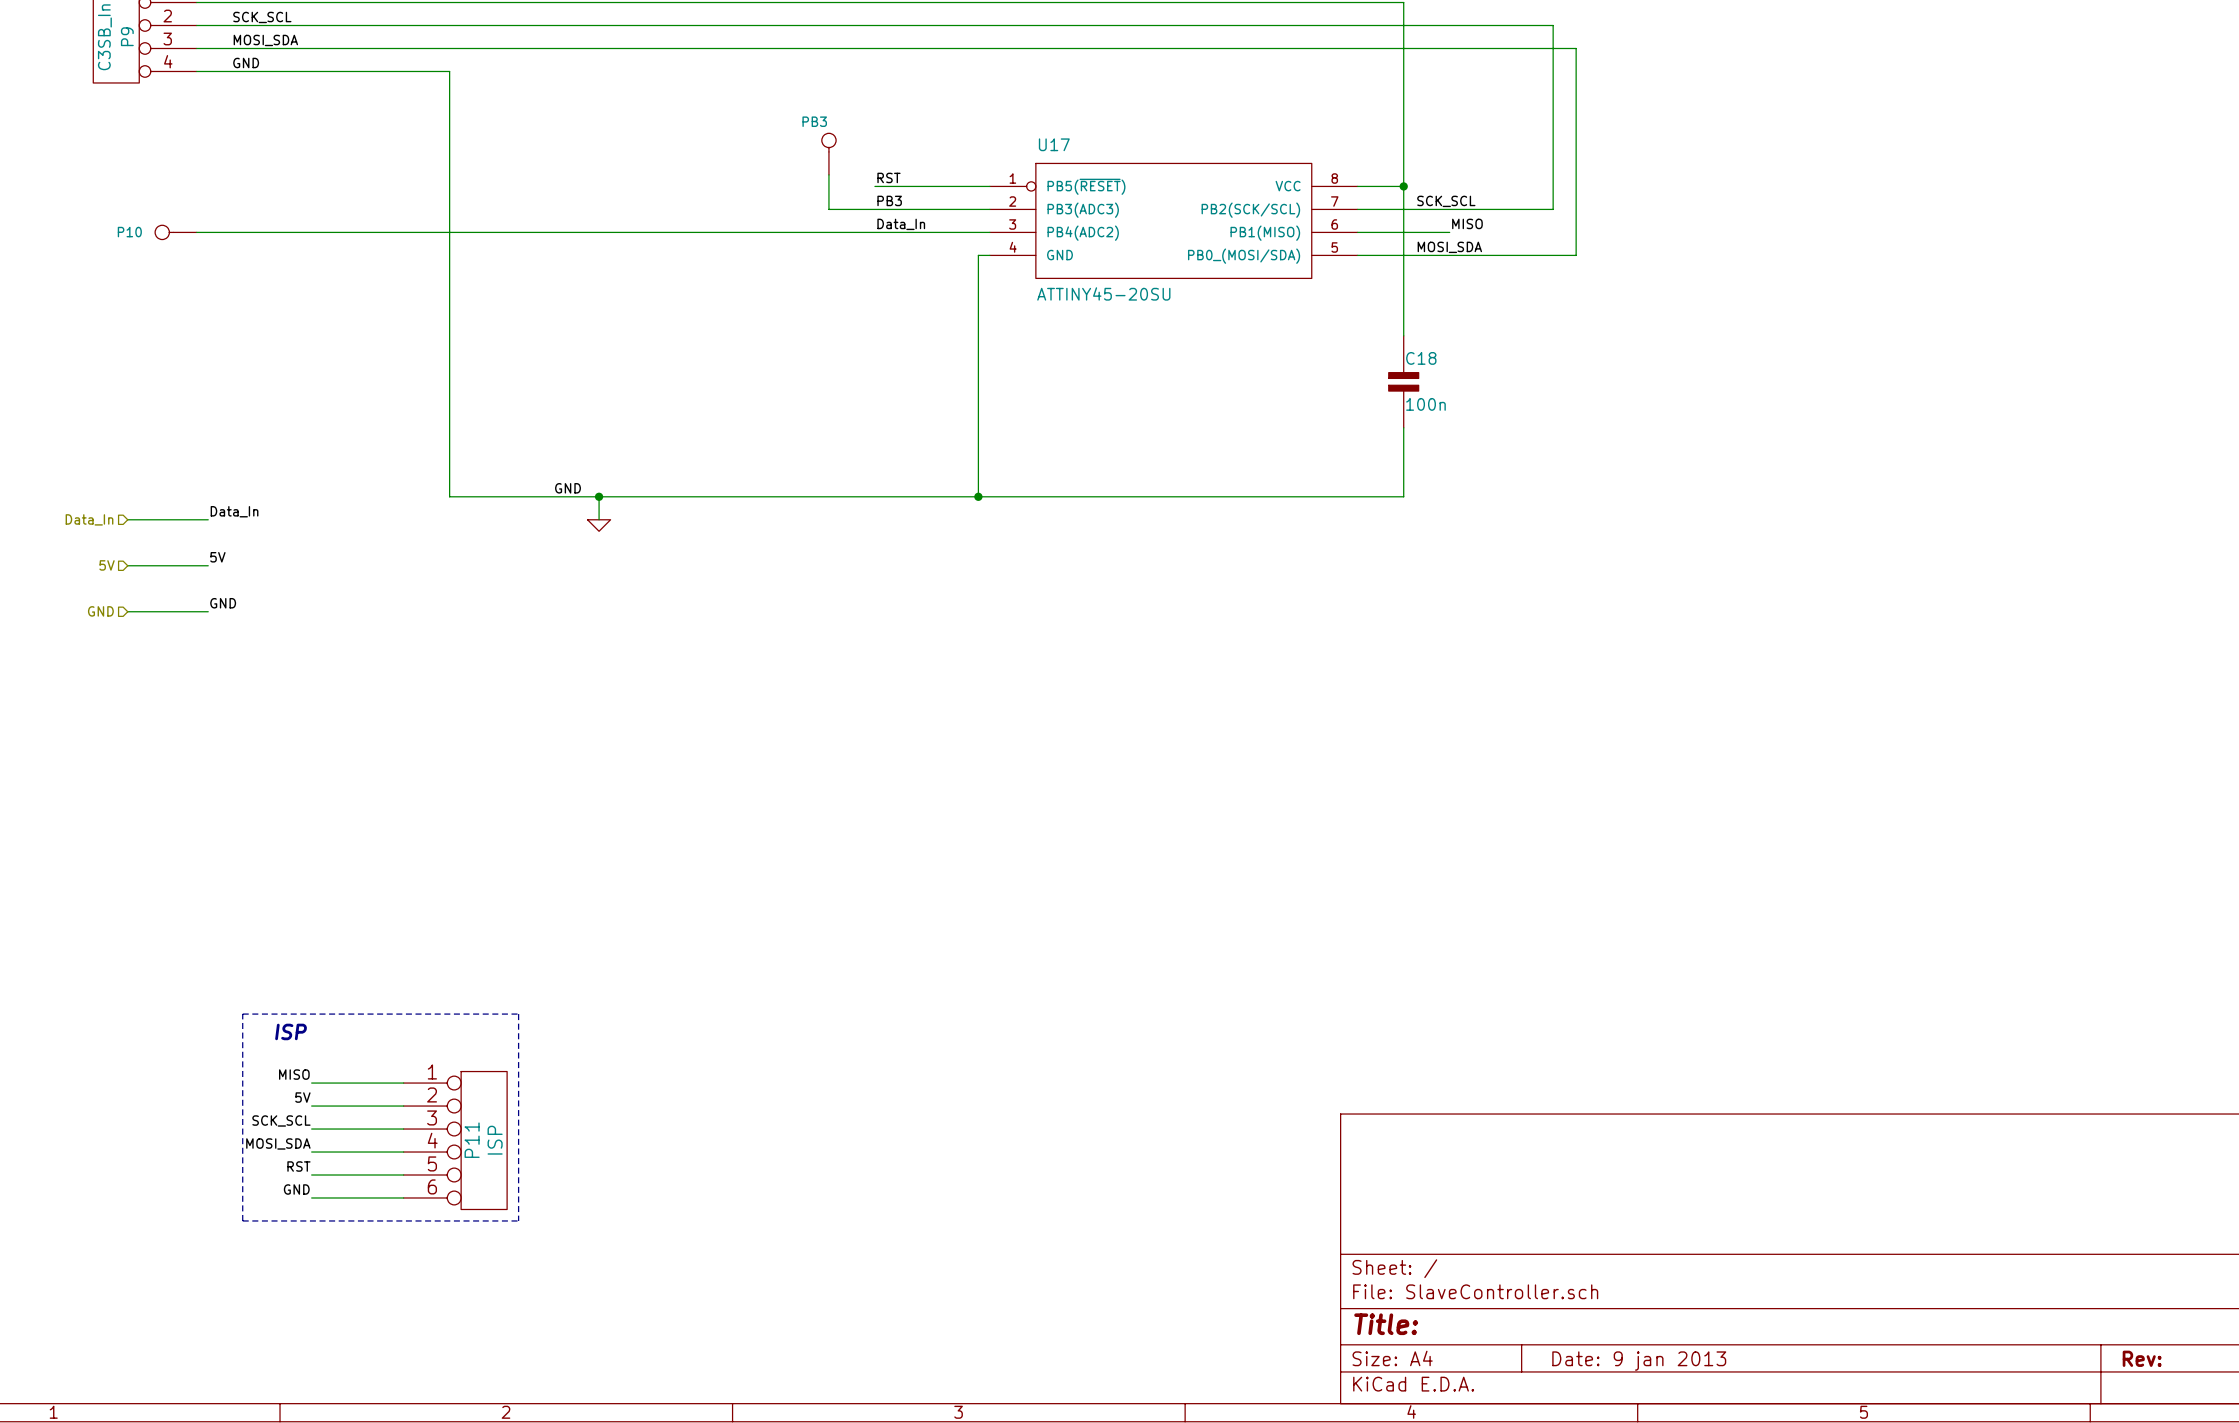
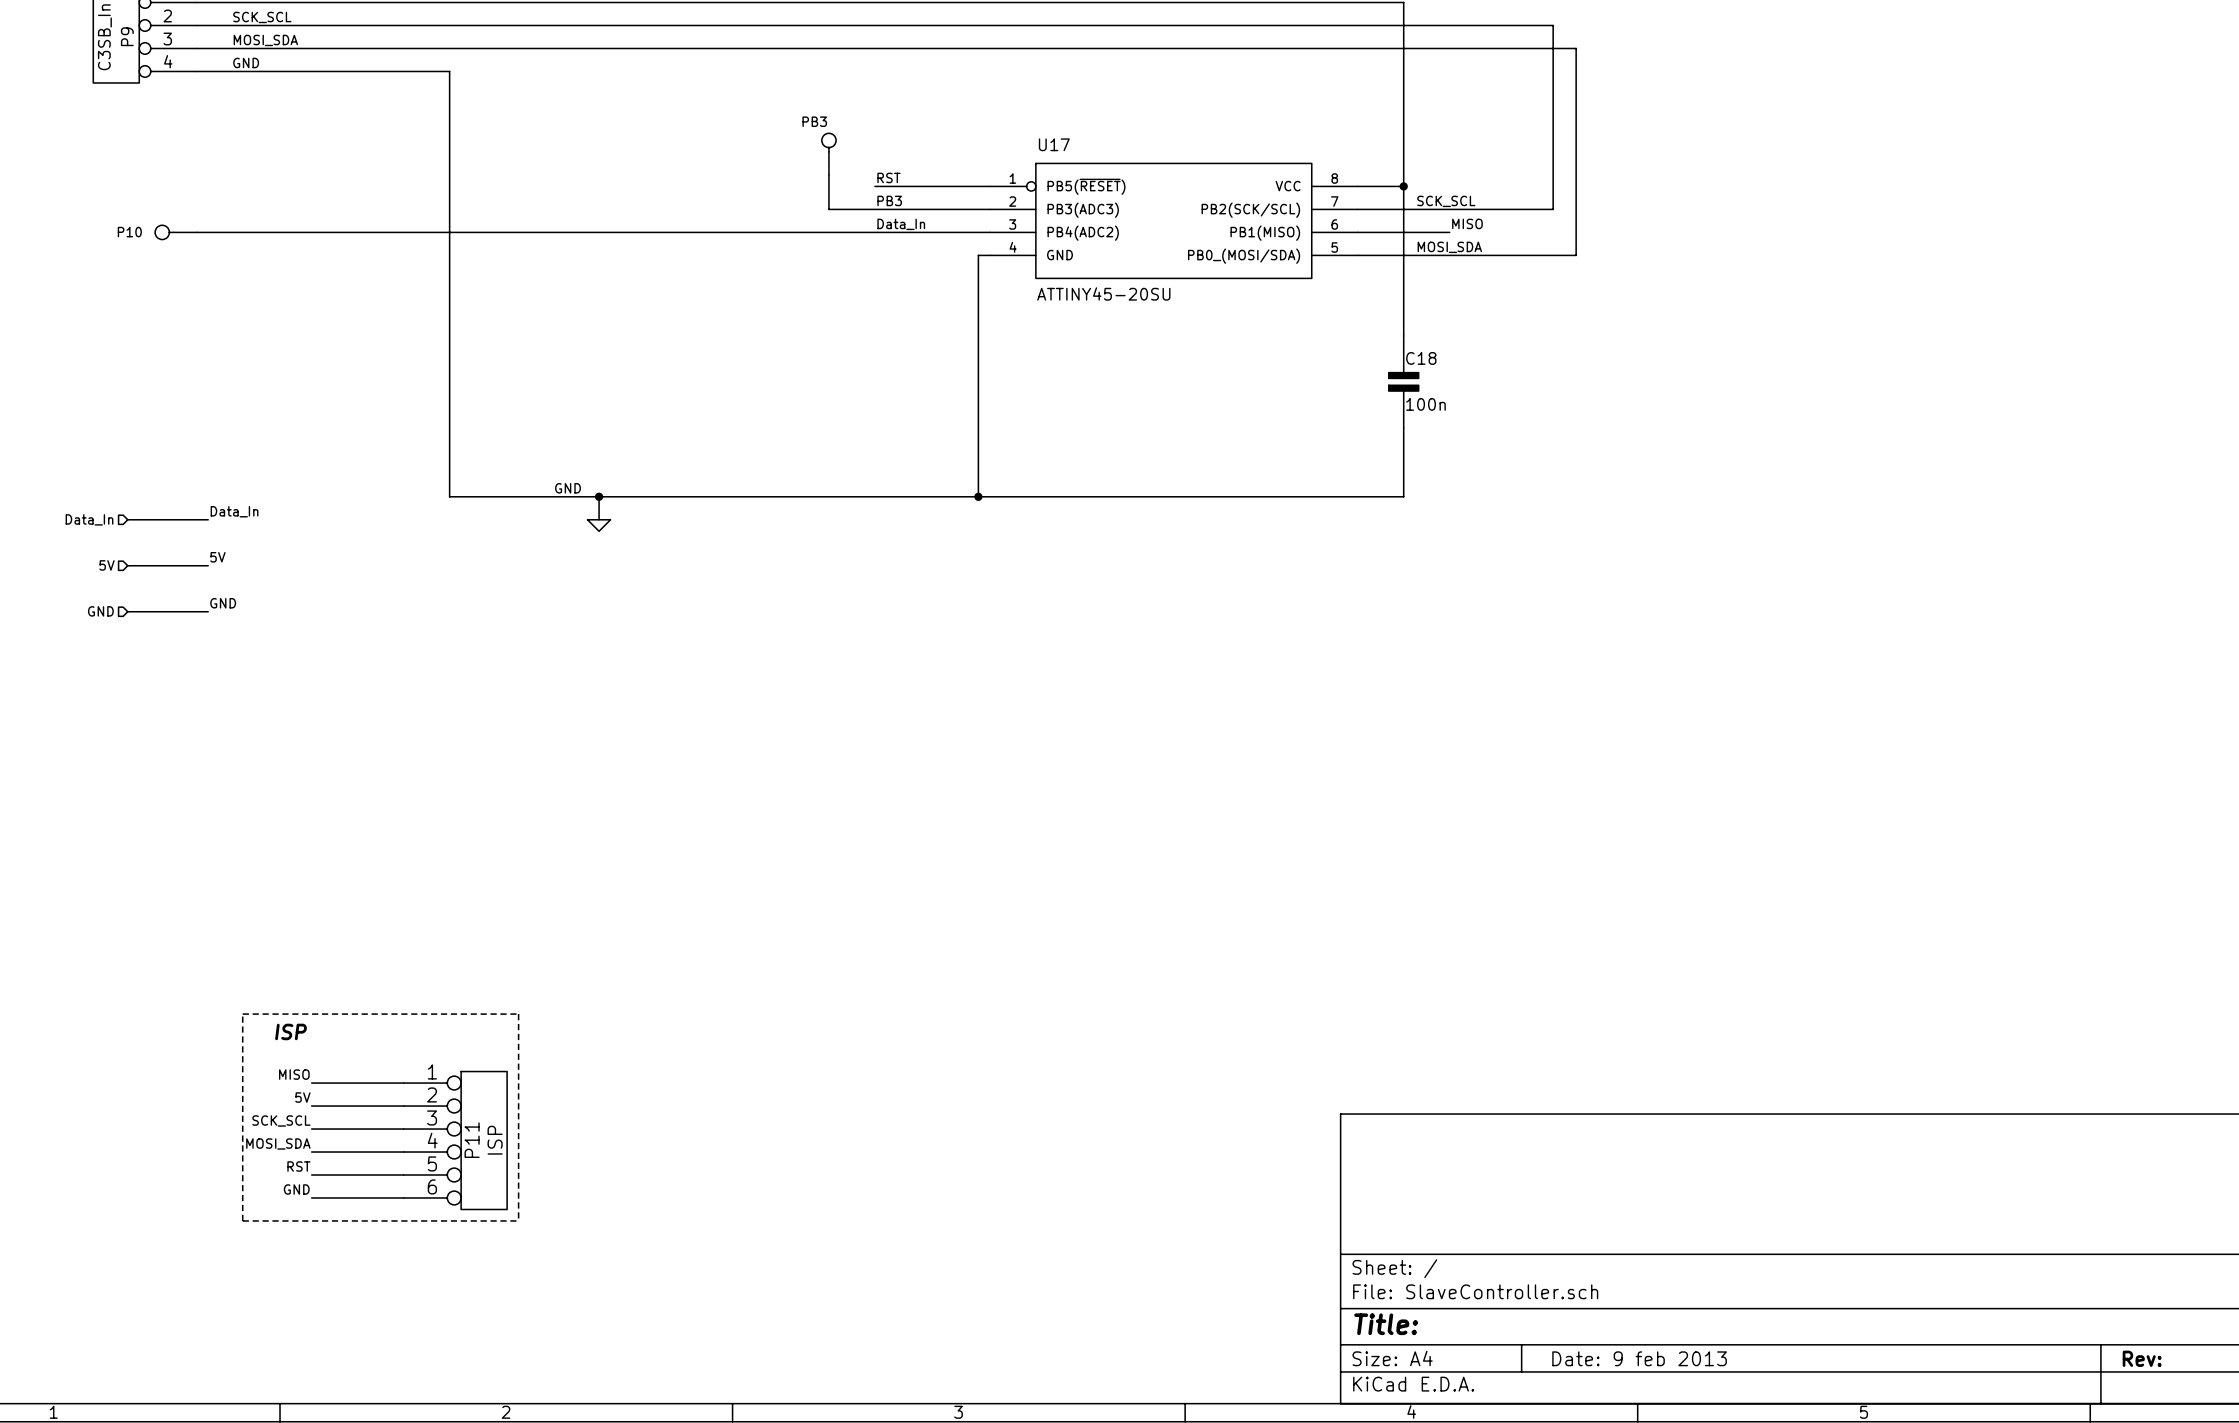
title block: Date: 9 jan 2013 (1639, 1361) -> Date: 9 feb 2013 (1639, 1358)

